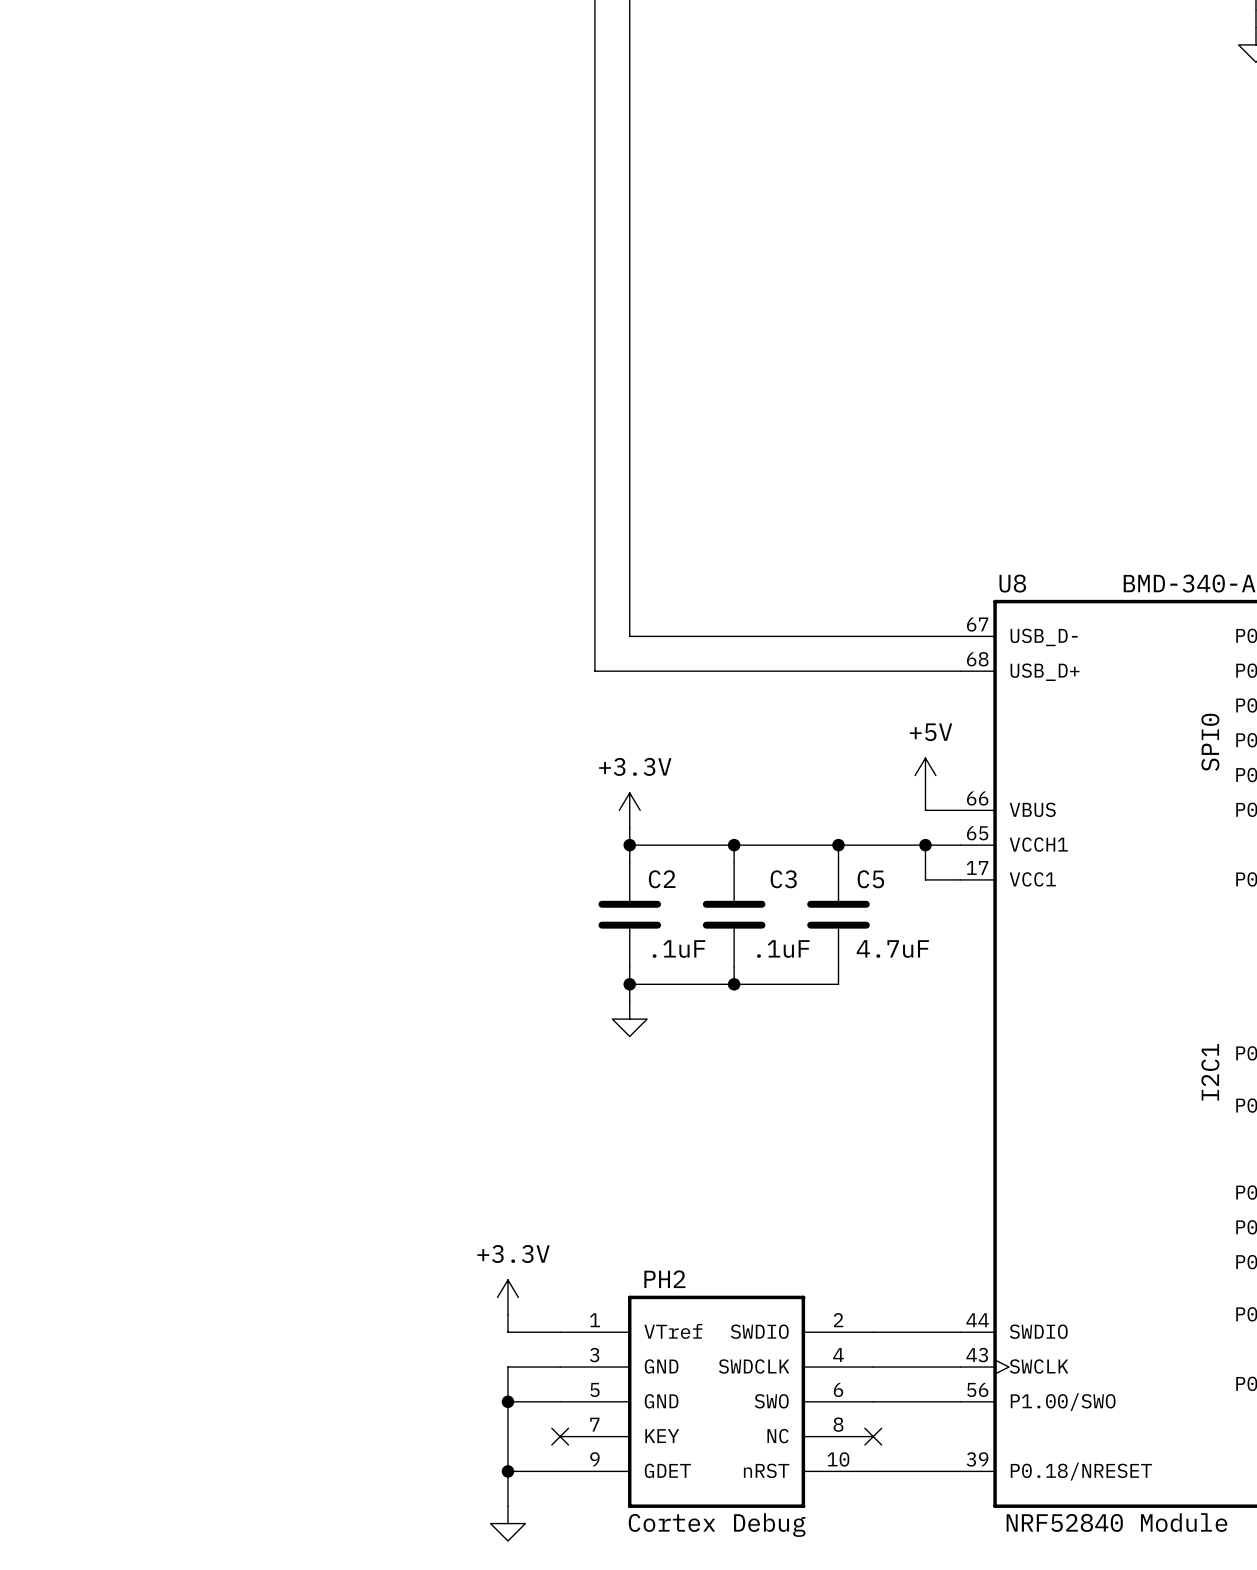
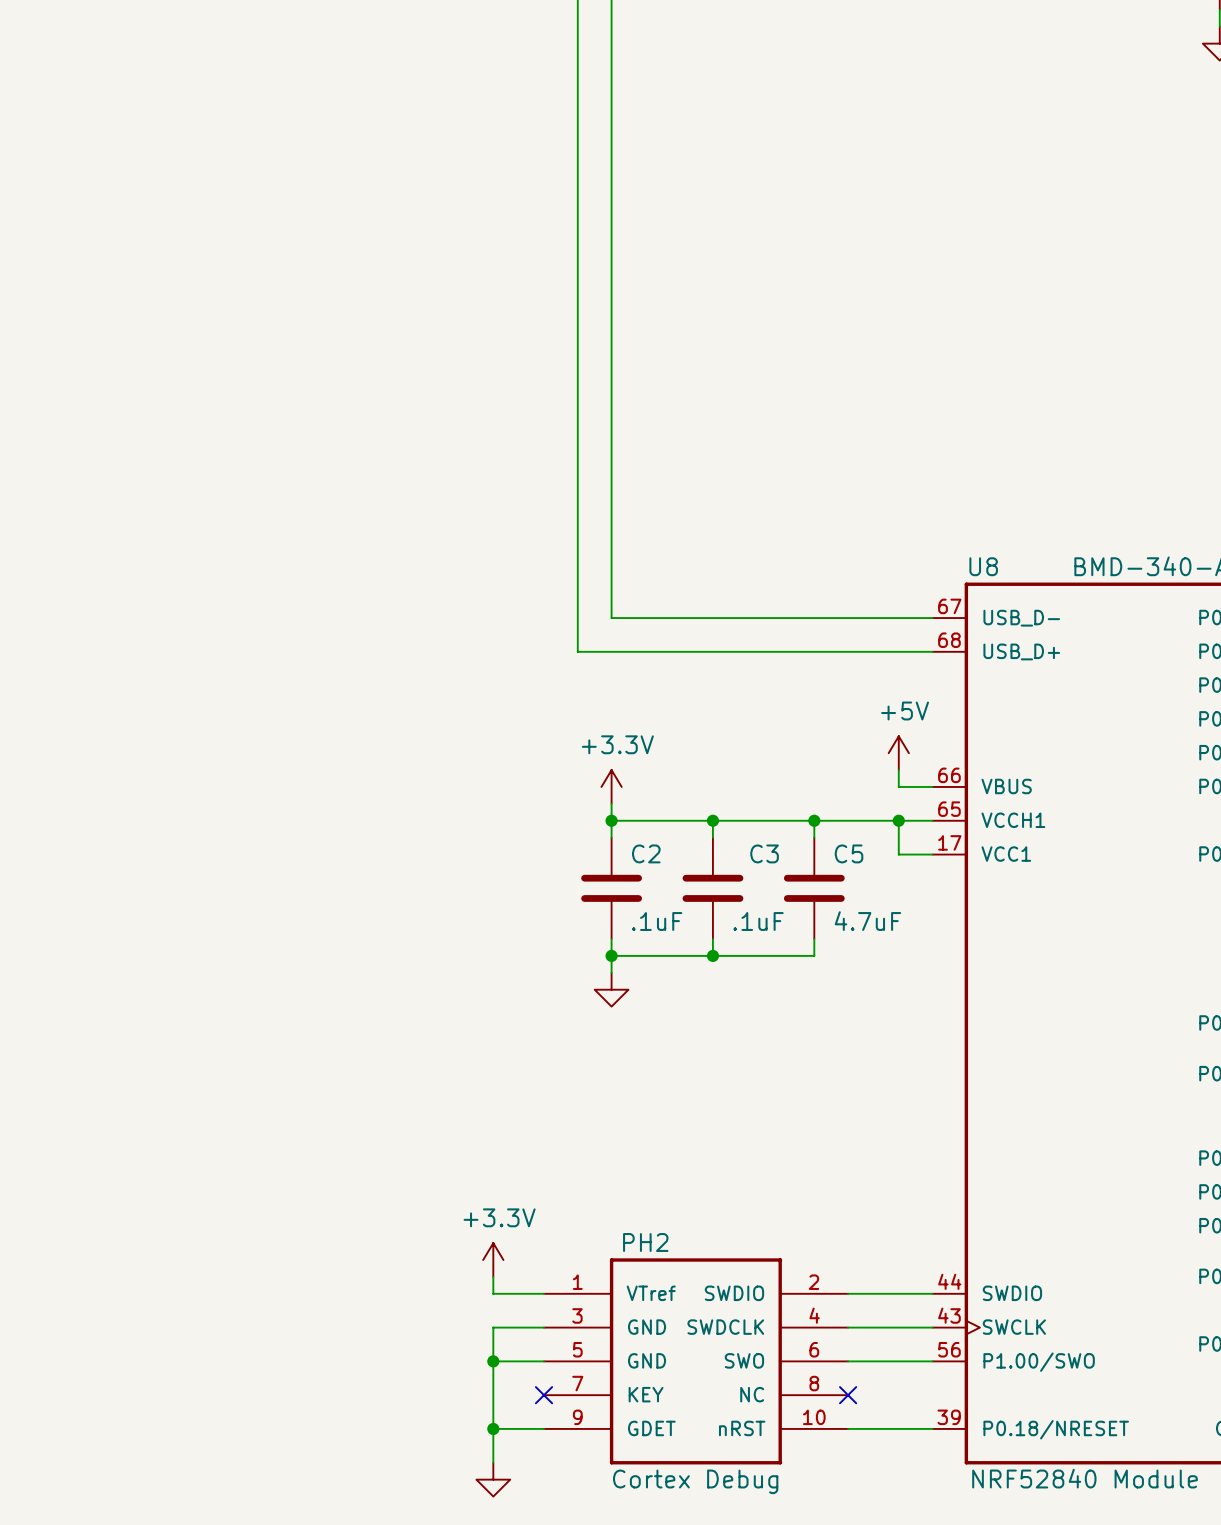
text: SPI0 (1210, 742) -> none
text: I2C1 (1210, 1072) -> none

